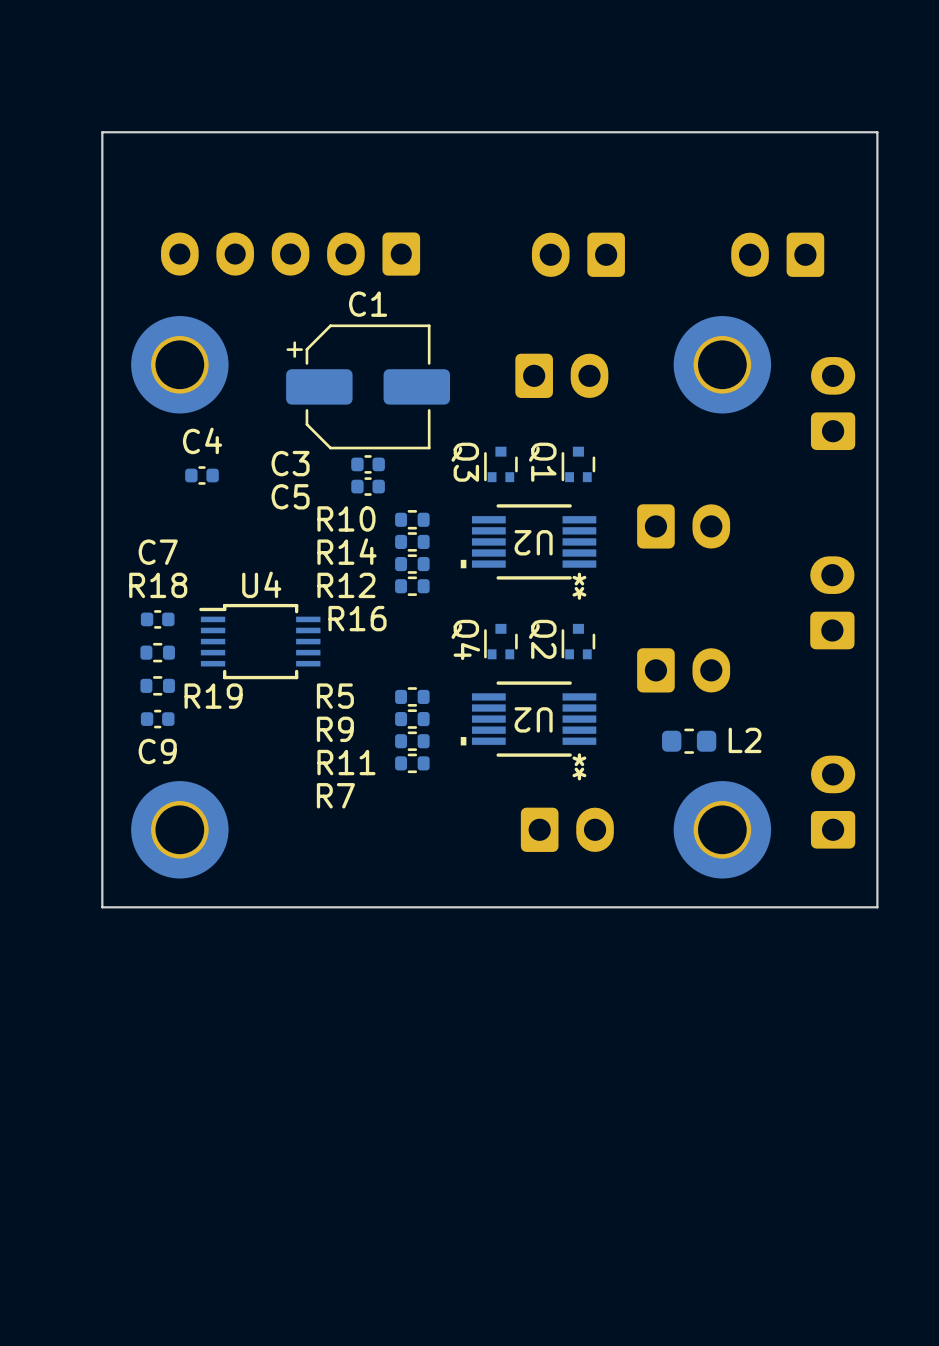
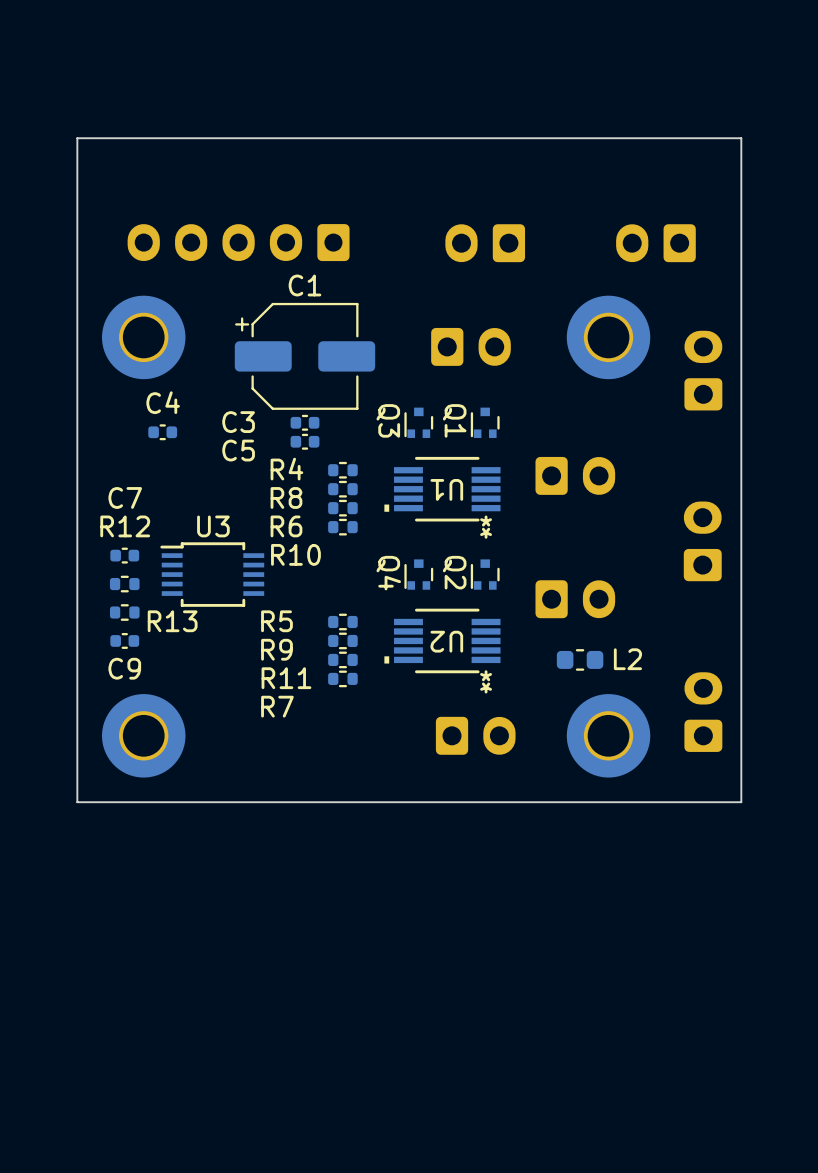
R10 name: R10 (346, 518) -> R4 (286, 469)
U2 name: U2 (533, 542) -> U1 (446, 489)
R14 name: R14 (346, 551) -> R8 (286, 497)
U4 name: U4 (261, 584) -> U3 (213, 526)
R18 name: R18 (158, 585) -> R12 (125, 526)
R12 name: R12 (346, 585) -> R6 (286, 526)
R16 name: R16 (357, 618) -> R10 (295, 554)
R19 name: R19 (213, 696) -> R13 (172, 621)

